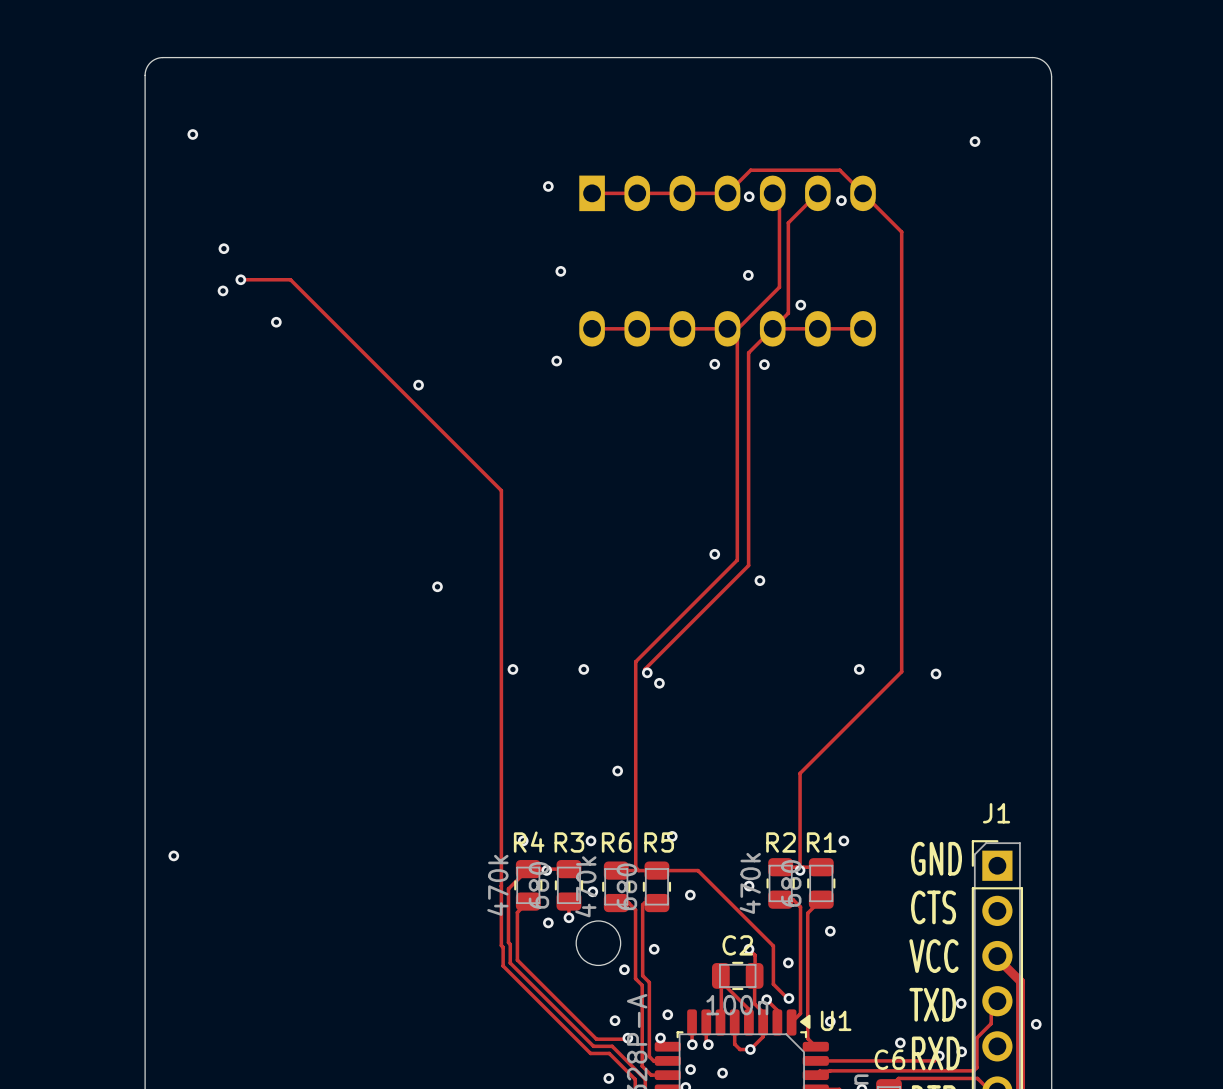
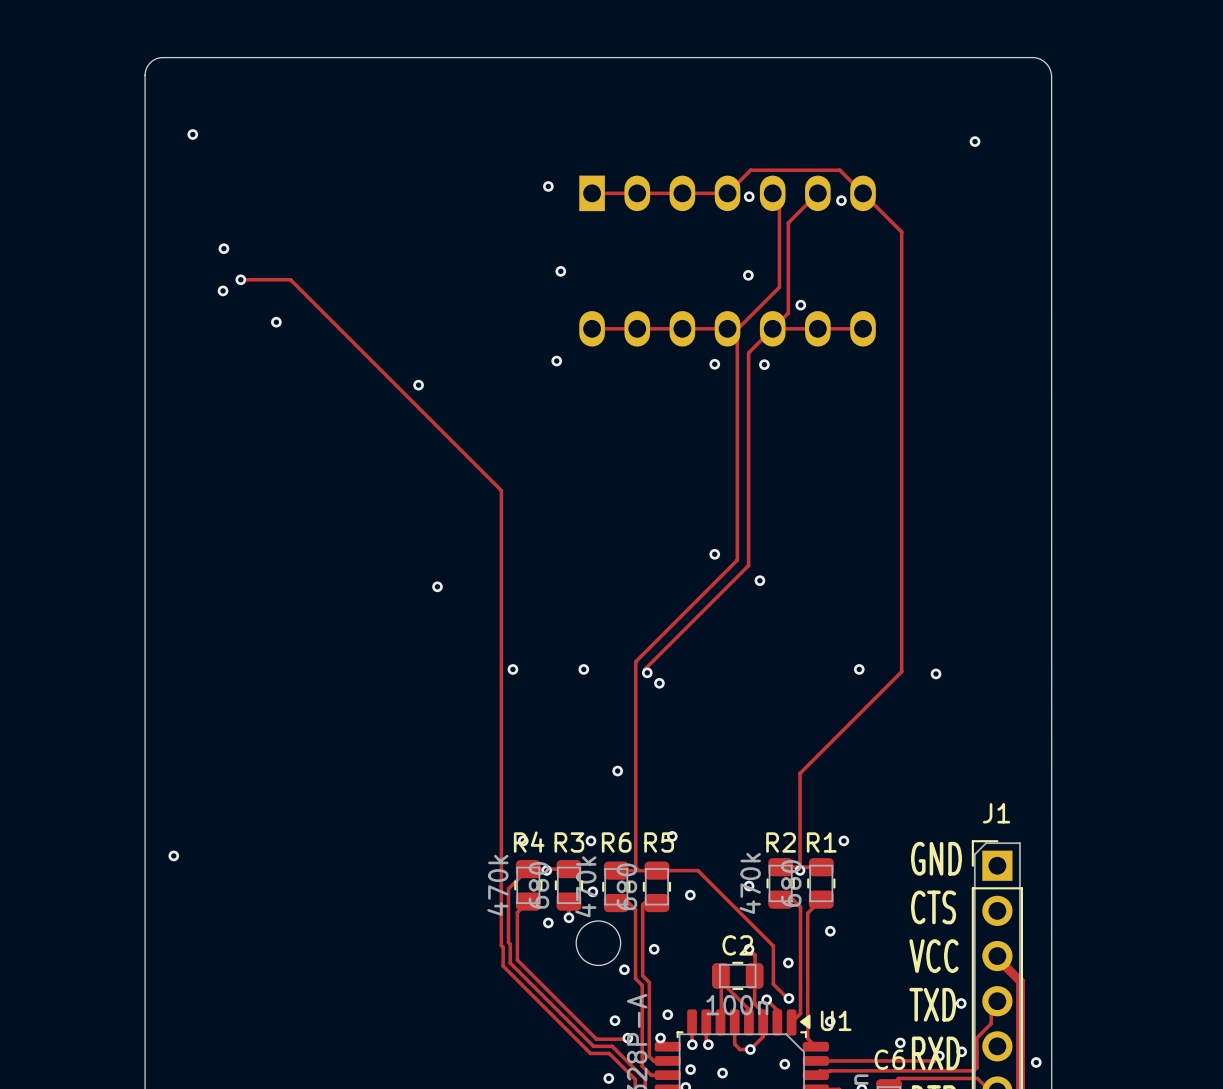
via position: (1036, 1024) -> (1036, 1062)
via: none -> (784, 1064)

